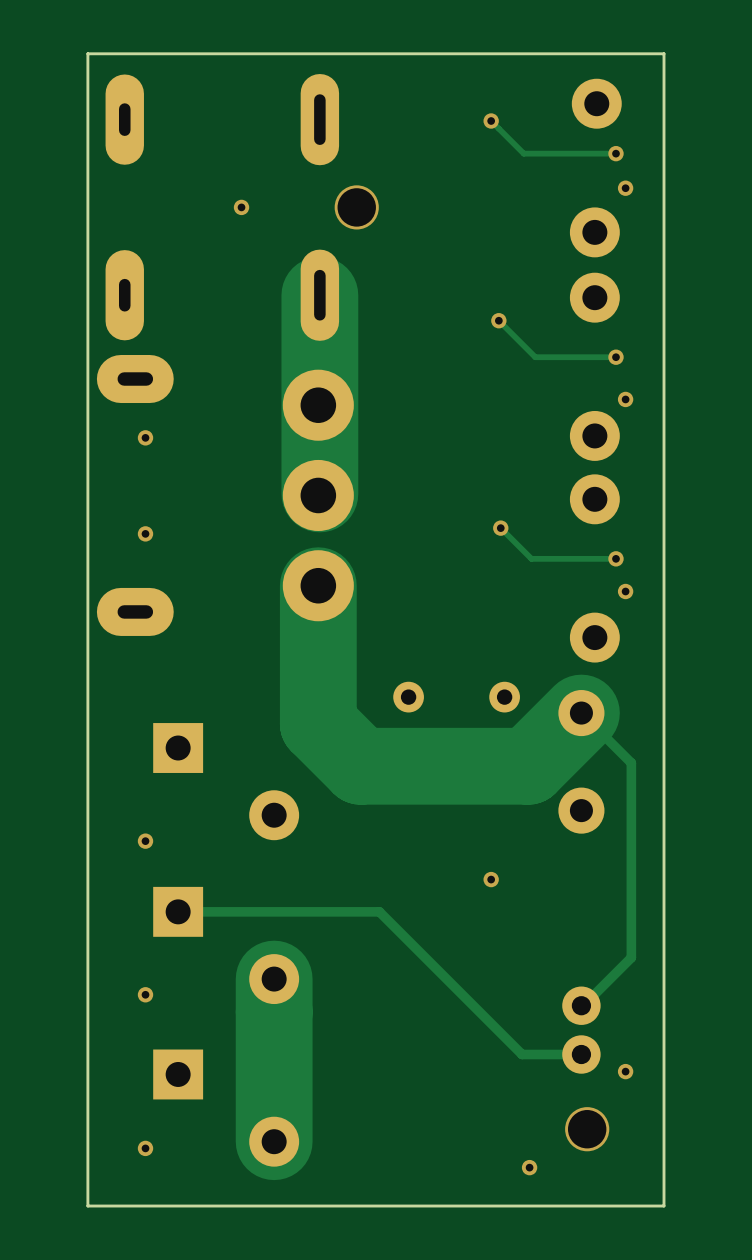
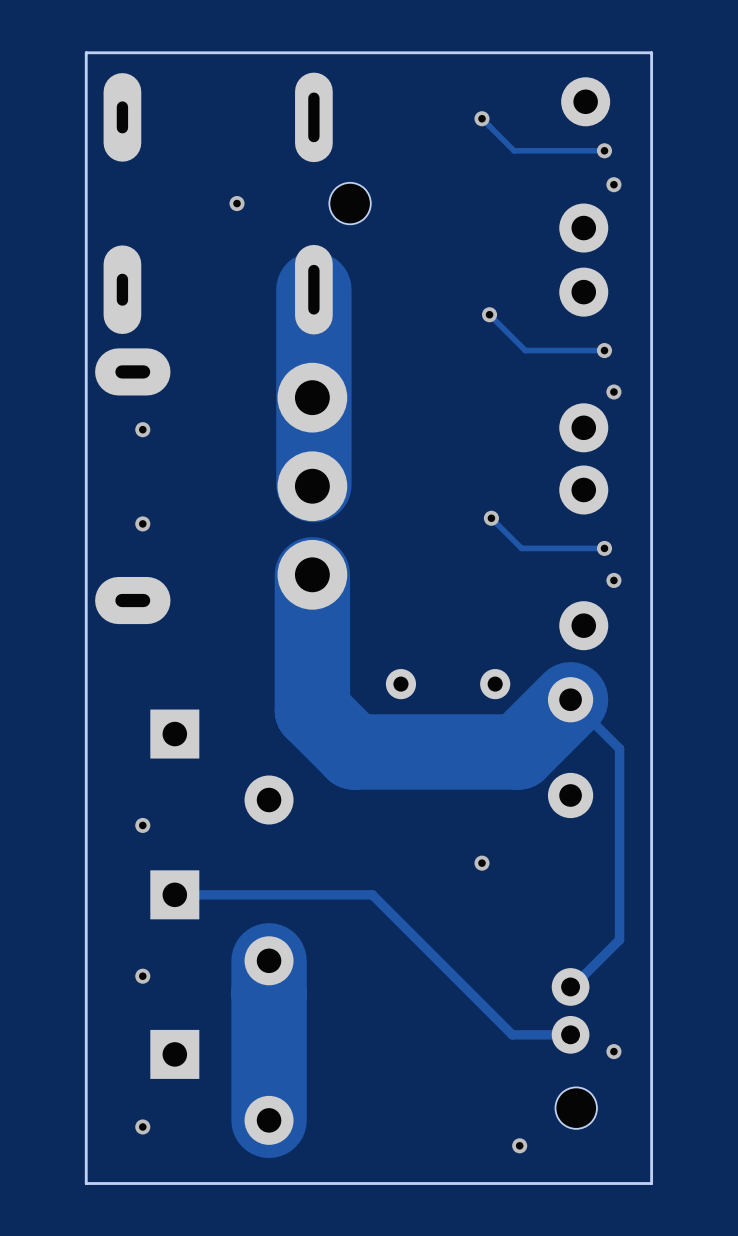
via: (356, 207) -> none
part: none -> (350, 203)
via: (587, 1129) -> none
part: none -> (576, 1108)

